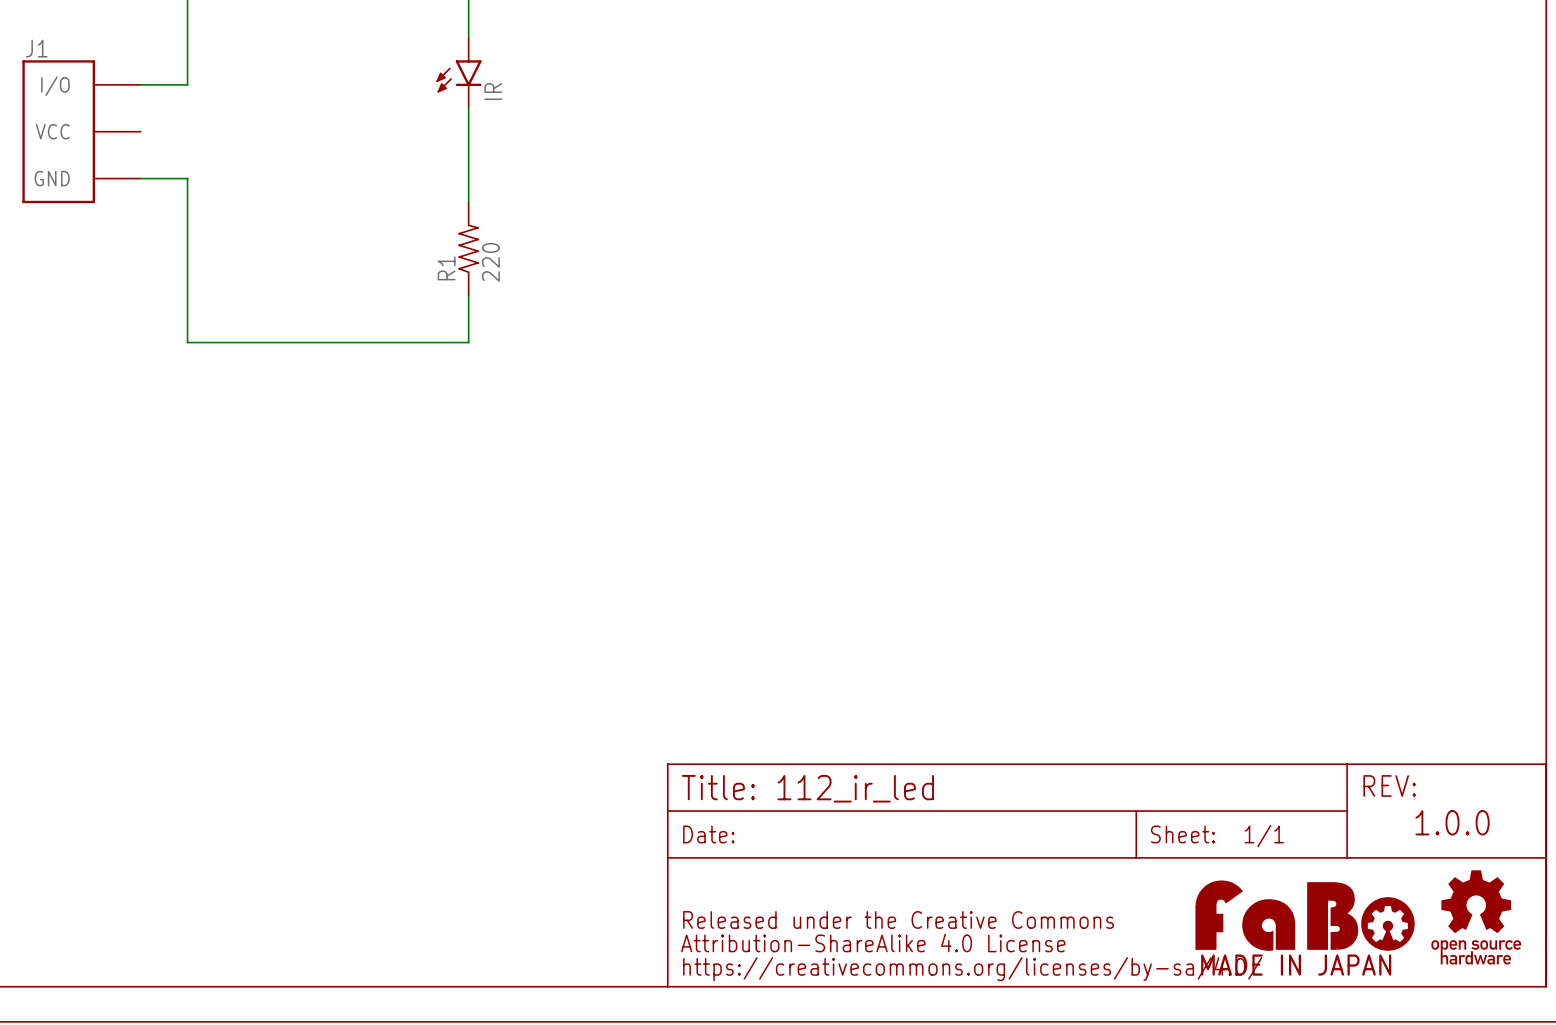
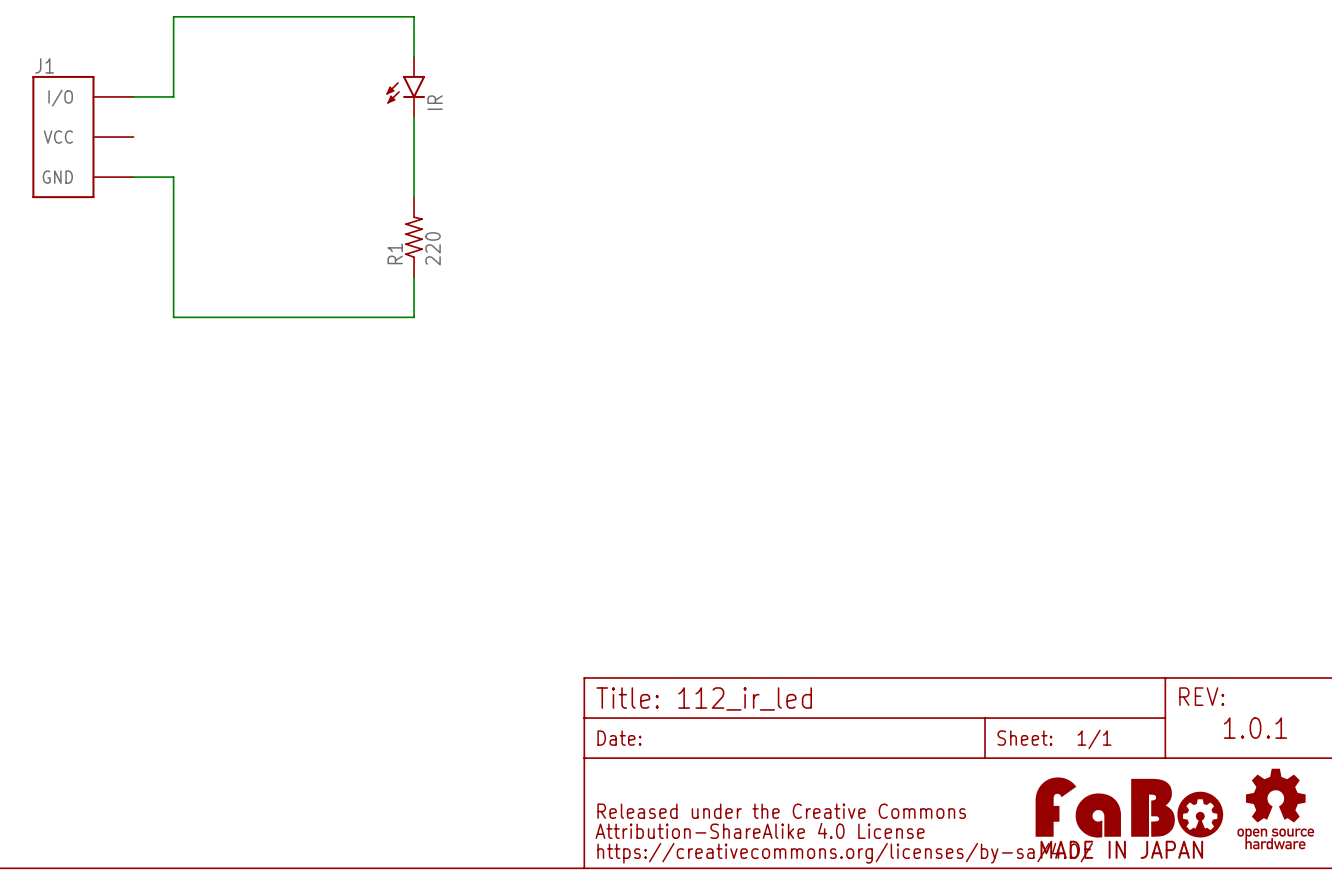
text: 1.0.0 (1452, 822) -> 1.0.1 (1255, 728)

